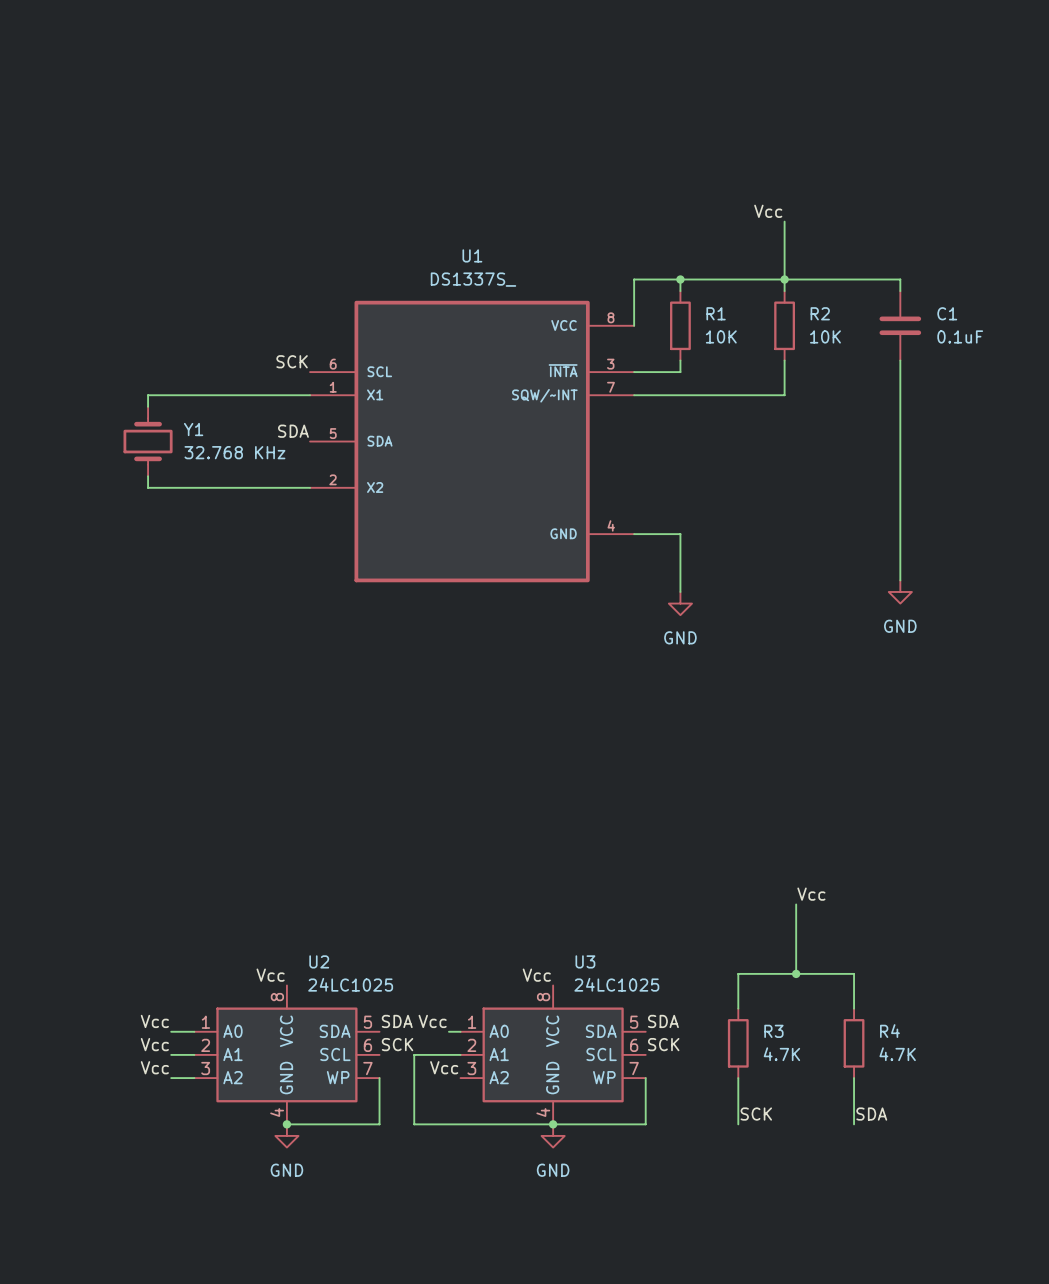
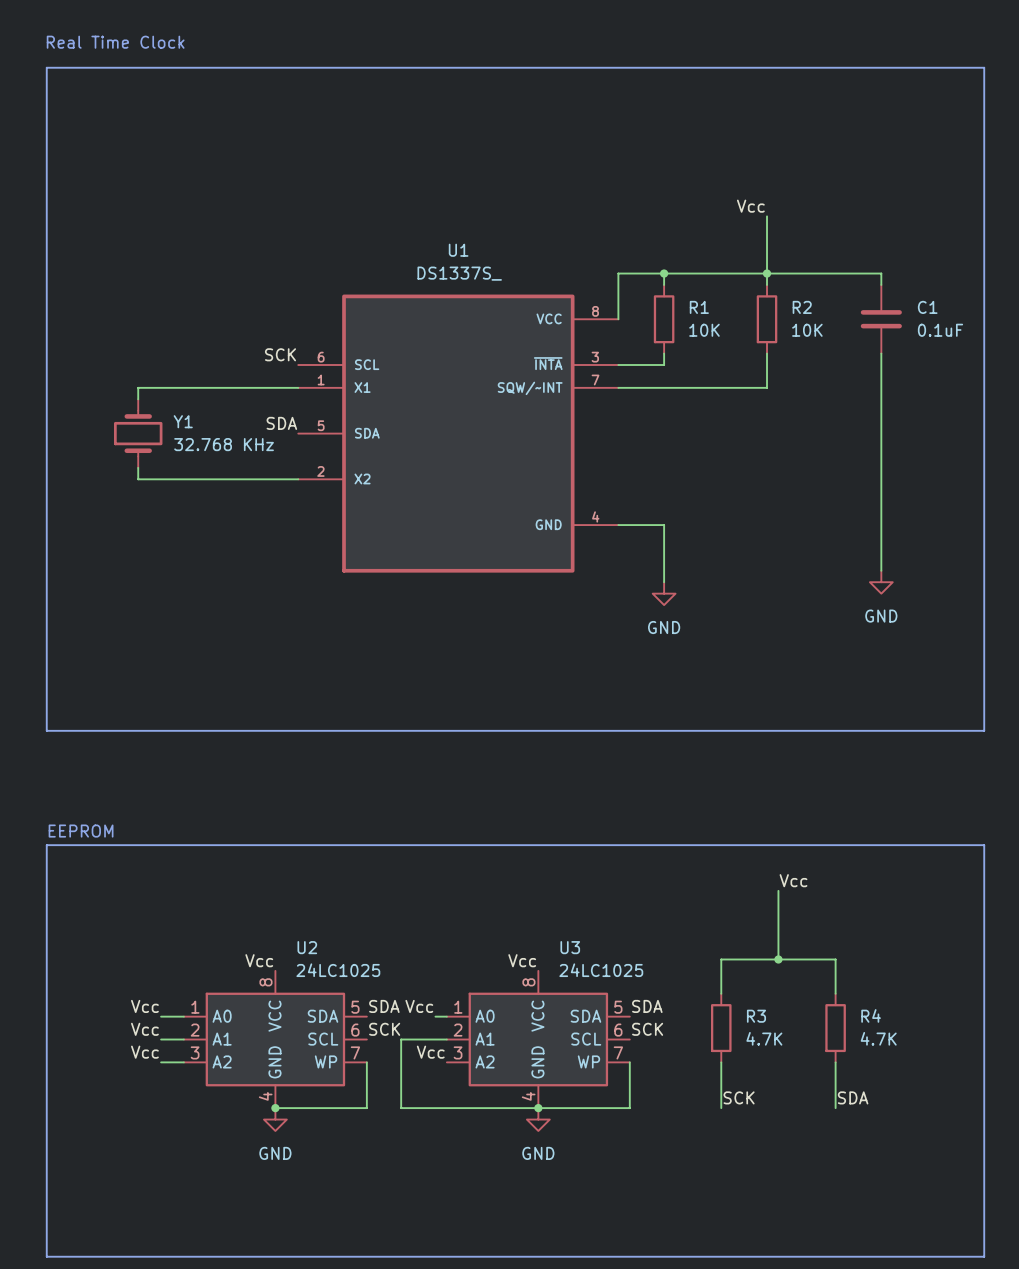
text: none -> Real Time Clock (115, 42)
line: none -> (46, 67) (984, 67) (984, 730) (46, 730) (46, 67)
text: none -> EEPROM (81, 831)
line: none -> (46, 845) (46, 1256) (984, 1256) (984, 845) (46, 845)

